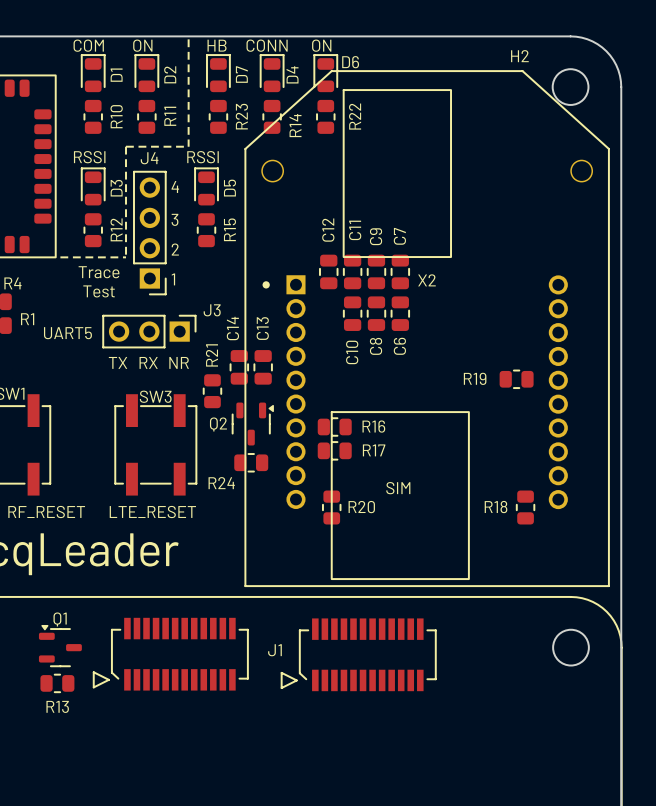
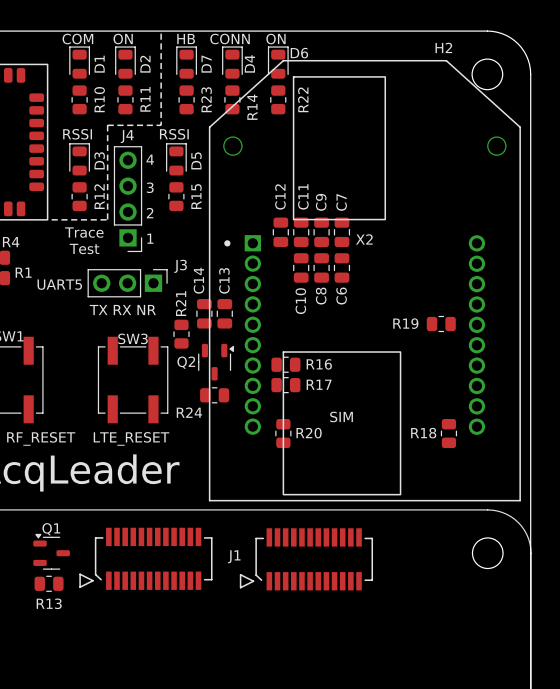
text: TX (118, 362) -> TX RX NR (122, 310)
text: RX (148, 362) -> none
text: NR (179, 362) -> none

